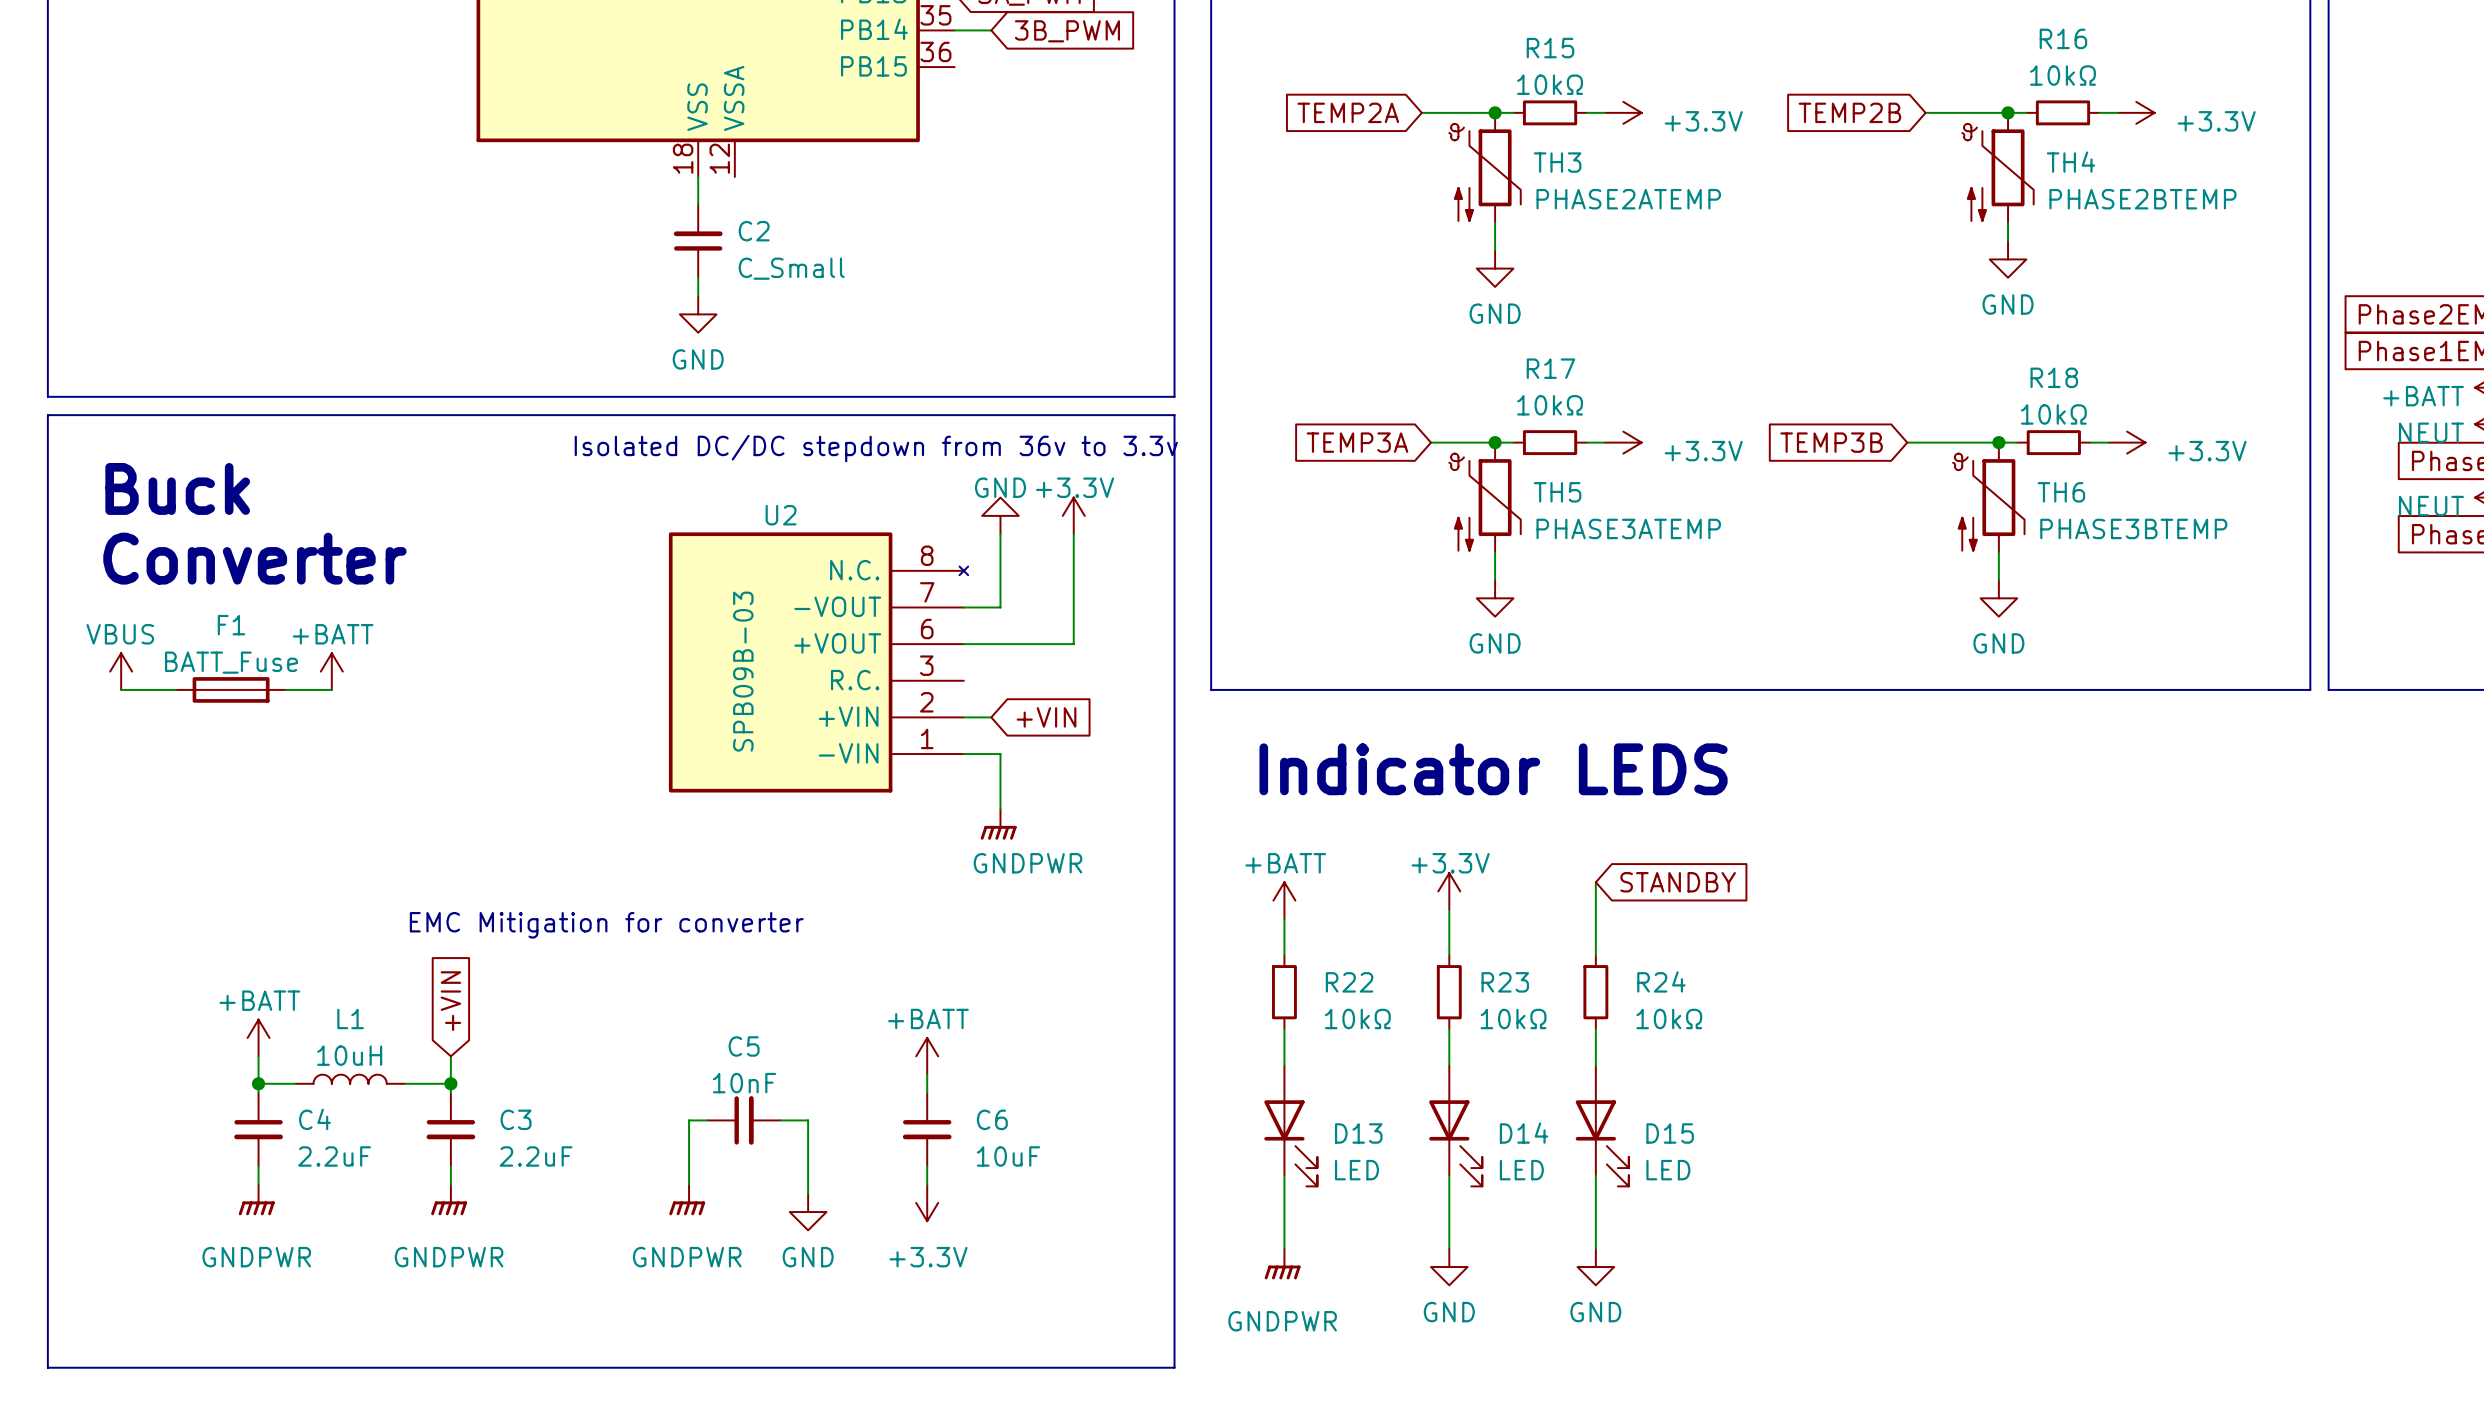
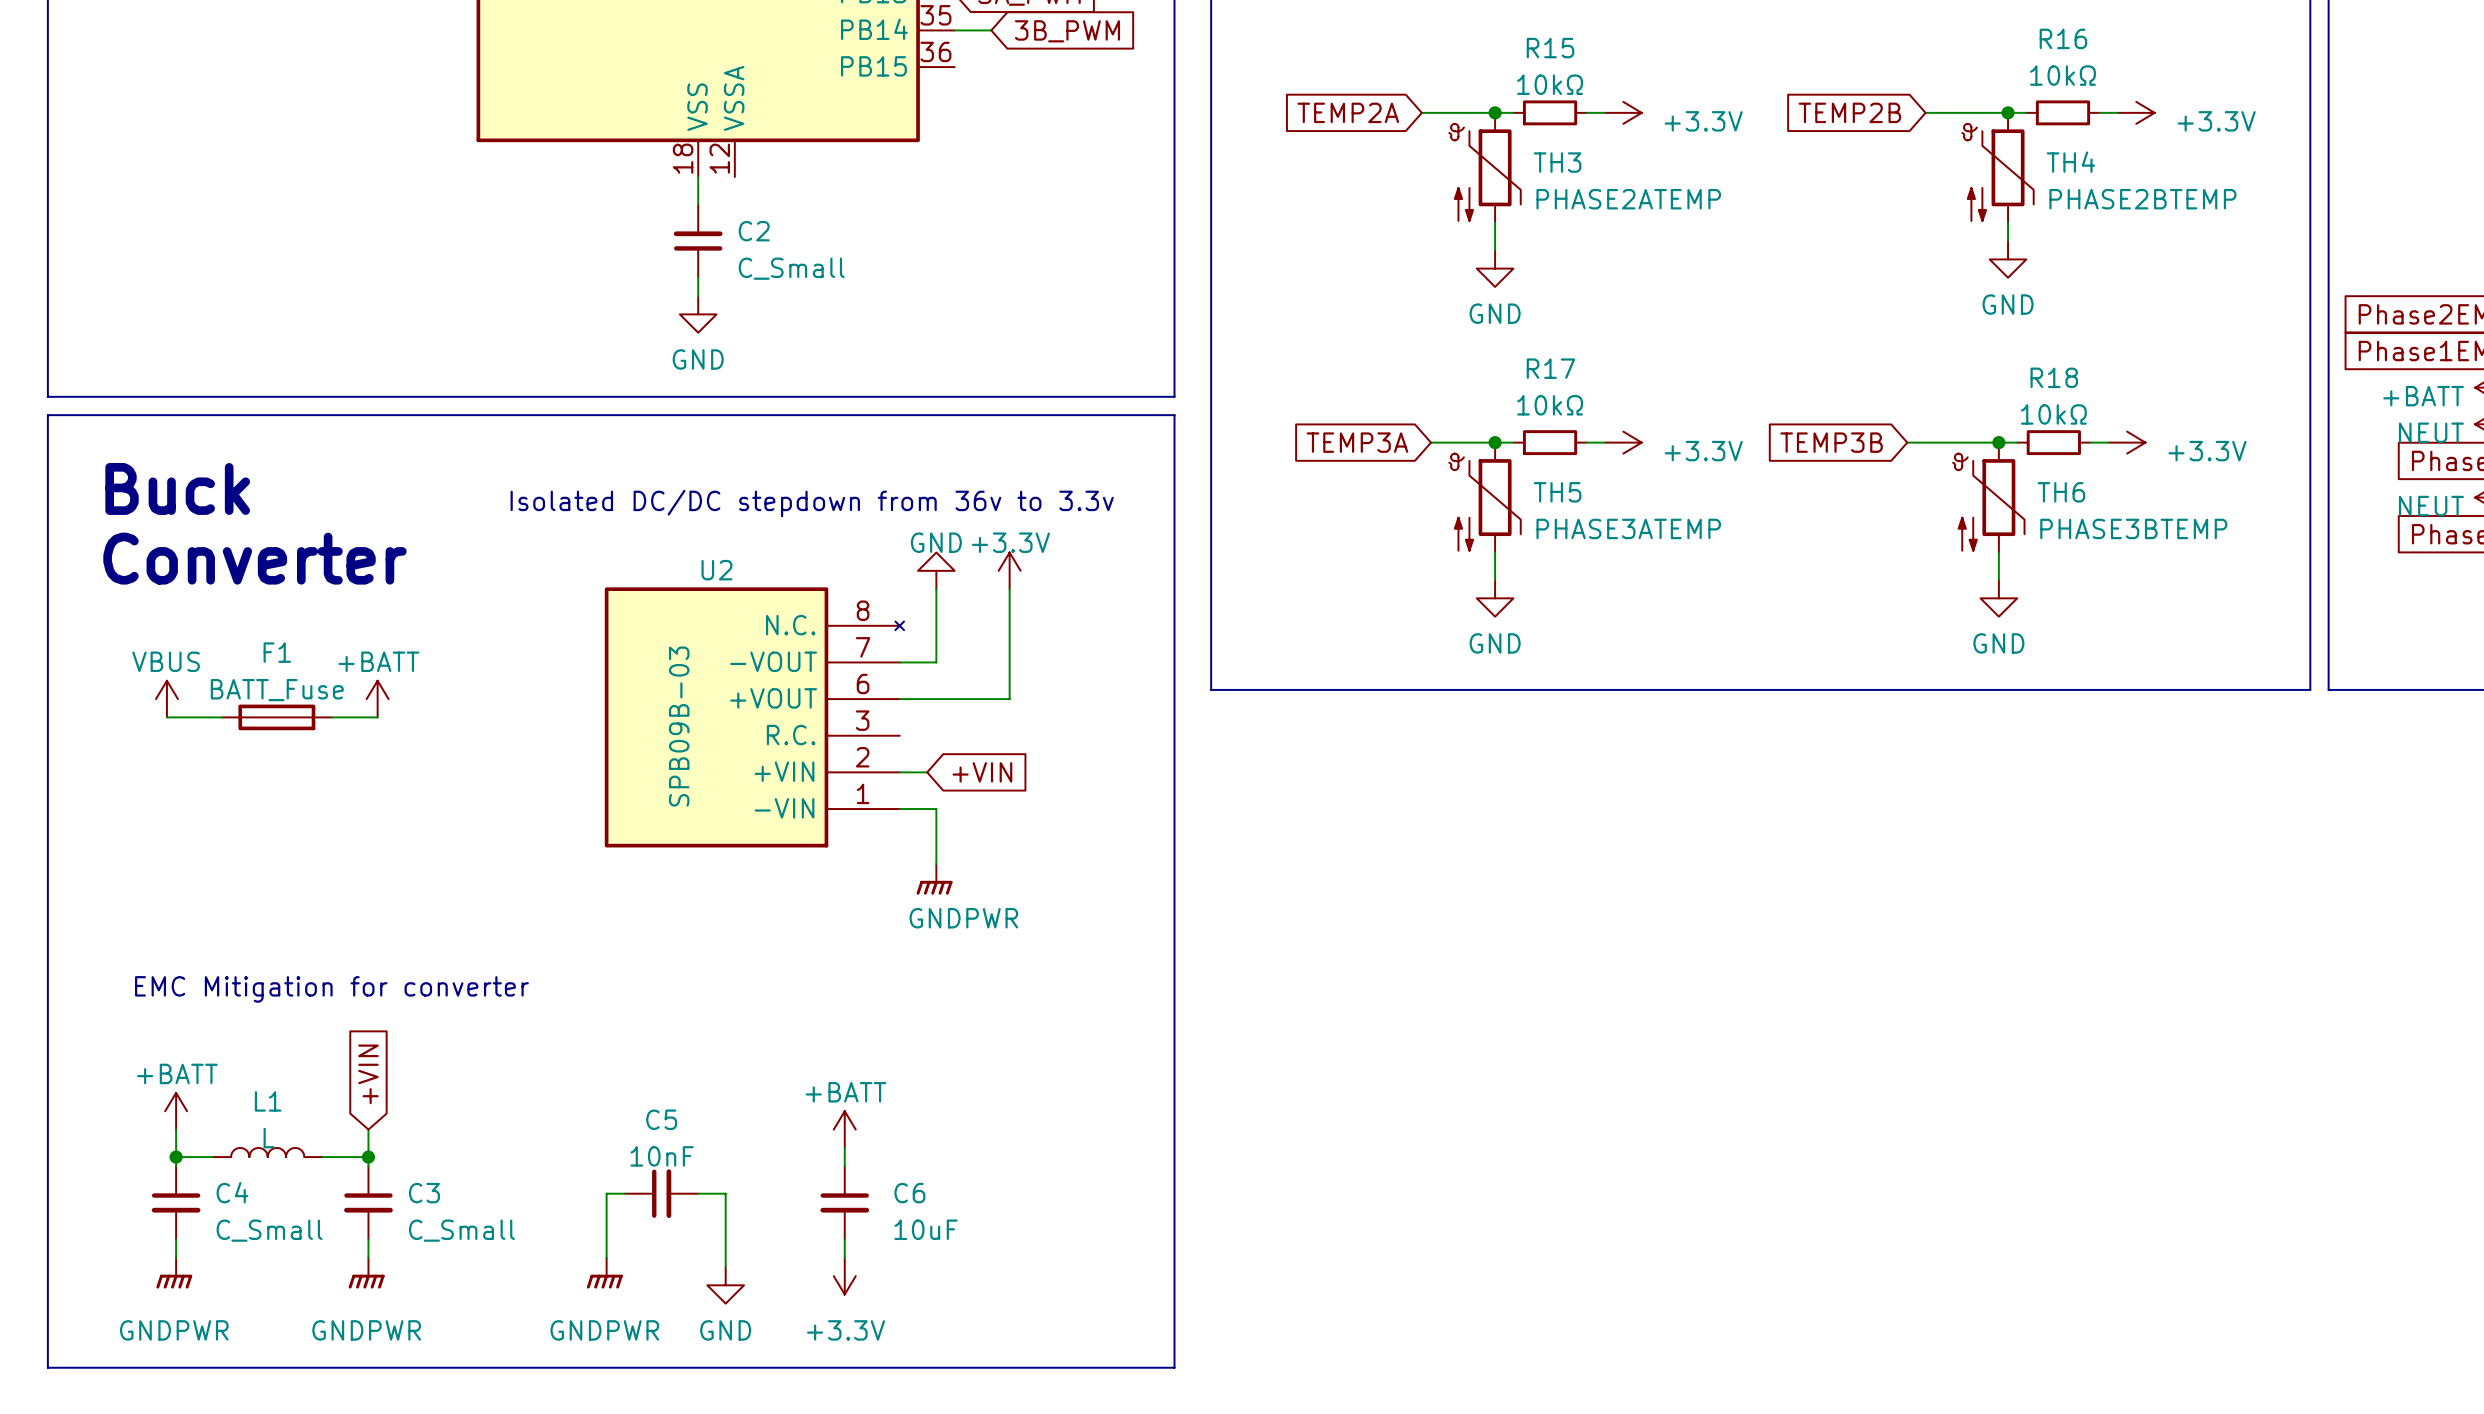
text position: Isolated DC/DC stepdown from 36v to 3.3v (876, 448) -> Isolated DC/DC stepdown from 36v to 3.3v (812, 503)
power symbol position: GND (1000, 515) -> GND (936, 570)
power symbol position: +3.3V (1073, 515) -> +3.3V (1009, 570)
wire: (1000, 534) (1000, 607) (963, 607) -> (936, 589) (936, 662) (899, 662)
wire: (1073, 534) (1073, 644) (963, 644) -> (1009, 589) (1009, 699) (899, 699)
U2 position: (818, 662) -> (754, 717)
power symbol position: VBUS (121, 671) -> VBUS (166, 699)
power symbol position: +BATT (331, 671) -> +BATT (377, 699)
wire: (121, 689) (176, 689) -> (166, 717) (221, 717)
F1 position: (231, 689) -> (276, 717)
wire: (286, 689) (331, 689) -> (331, 717) (377, 717)
wire: (963, 717) (991, 717) -> (899, 772) (927, 772)
global label position: +VIN (1046, 717) -> +VIN (982, 772)
wire: (963, 754) (1000, 754) (1000, 809) -> (899, 809) (936, 809) (936, 863)
text: Indicator LEDS (1493, 769) -> none
power symbol position: GNDPWR (998, 824) -> GNDPWR (934, 879)
wire: (1595, 882) (1595, 955) -> none
global label: STANDBY (1678, 882) -> none
power symbol: +3.3V (1449, 891) -> none
power symbol: +BATT (1284, 900) -> none
wire: (1449, 909) (1449, 955) -> none
wire: (1284, 918) (1284, 955) -> none
text position: EMC Mitigation for converter (606, 925) -> EMC Mitigation for converter (331, 989)
R22: 10kΩ (1284, 992) -> none
R23: 10kΩ (1449, 992) -> none
R24: 10kΩ (1595, 992) -> none
global label position: +VIN (450, 1001) -> +VIN (368, 1074)
L1 name position: L1 (350, 1018) -> L1 (268, 1101)
wire: (1284, 1028) (1284, 1065) -> none
wire: (1449, 1028) (1449, 1065) -> none
wire: (1595, 1028) (1595, 1065) -> none
power symbol position: +BATT (258, 1037) -> +BATT (176, 1111)
L1 value: 10uH (349, 1055) -> L (269, 1138)
wire: (258, 1056) (258, 1092) -> (176, 1129) (176, 1166)
wire: (450, 1056) (450, 1092) -> (368, 1129) (368, 1166)
power symbol position: +BATT (927, 1056) -> +BATT (844, 1129)
wire: (927, 1074) (927, 1092) -> (844, 1147) (844, 1166)
L1 position: (350, 1079) -> (267, 1152)
wire: (258, 1083) (295, 1083) -> (176, 1157) (212, 1157)
junction: (258, 1083) -> none
wire: (405, 1083) (450, 1083) -> (322, 1157) (368, 1157)
junction: (450, 1083) -> none
C3 name position: C3 (516, 1119) -> C3 (424, 1193)
wire: (707, 1120) (689, 1120) (689, 1184) -> (624, 1193) (606, 1193) (606, 1257)
C5 position: (744, 1120) -> (661, 1193)
wire: (780, 1120) (808, 1120) (808, 1193) -> (698, 1193) (725, 1193) (725, 1266)
D13: LED (1290, 1125) -> none
D14: LED (1455, 1125) -> none
D15: LED (1602, 1125) -> none
C4 position: (258, 1129) -> (176, 1202)
C3 position: (450, 1129) -> (368, 1202)
C6 position: (927, 1129) -> (844, 1202)
C4 value: 2.2uF (334, 1156) -> C_Small (269, 1230)
C3 value: 2.2uF (536, 1156) -> C_Small (461, 1230)
junction: none -> (176, 1157)
junction: none -> (368, 1157)
wire: (258, 1166) (258, 1184) -> (176, 1239) (176, 1257)
wire: (450, 1166) (450, 1184) -> (368, 1239) (368, 1257)
wire: (927, 1166) (927, 1184) -> (844, 1239) (844, 1257)
wire: (1284, 1175) (1284, 1248) -> none
wire: (1449, 1175) (1449, 1248) -> none
wire: (1595, 1175) (1595, 1248) -> none
power symbol: GNDPWR (256, 1199) -> none
power symbol: GNDPWR (449, 1199) -> none
power symbol: GNDPWR (687, 1199) -> none
power symbol position: +3.3V (927, 1202) -> +3.3V (844, 1276)
power symbol position: GND (808, 1212) -> GND (725, 1285)
power symbol: GNDPWR (1282, 1264) -> none
power symbol: GND (1449, 1266) -> none
power symbol: GND (1595, 1266) -> none
power symbol: none -> GNDPWR (174, 1273)
power symbol: none -> GNDPWR (366, 1273)
power symbol: none -> GNDPWR (604, 1273)

